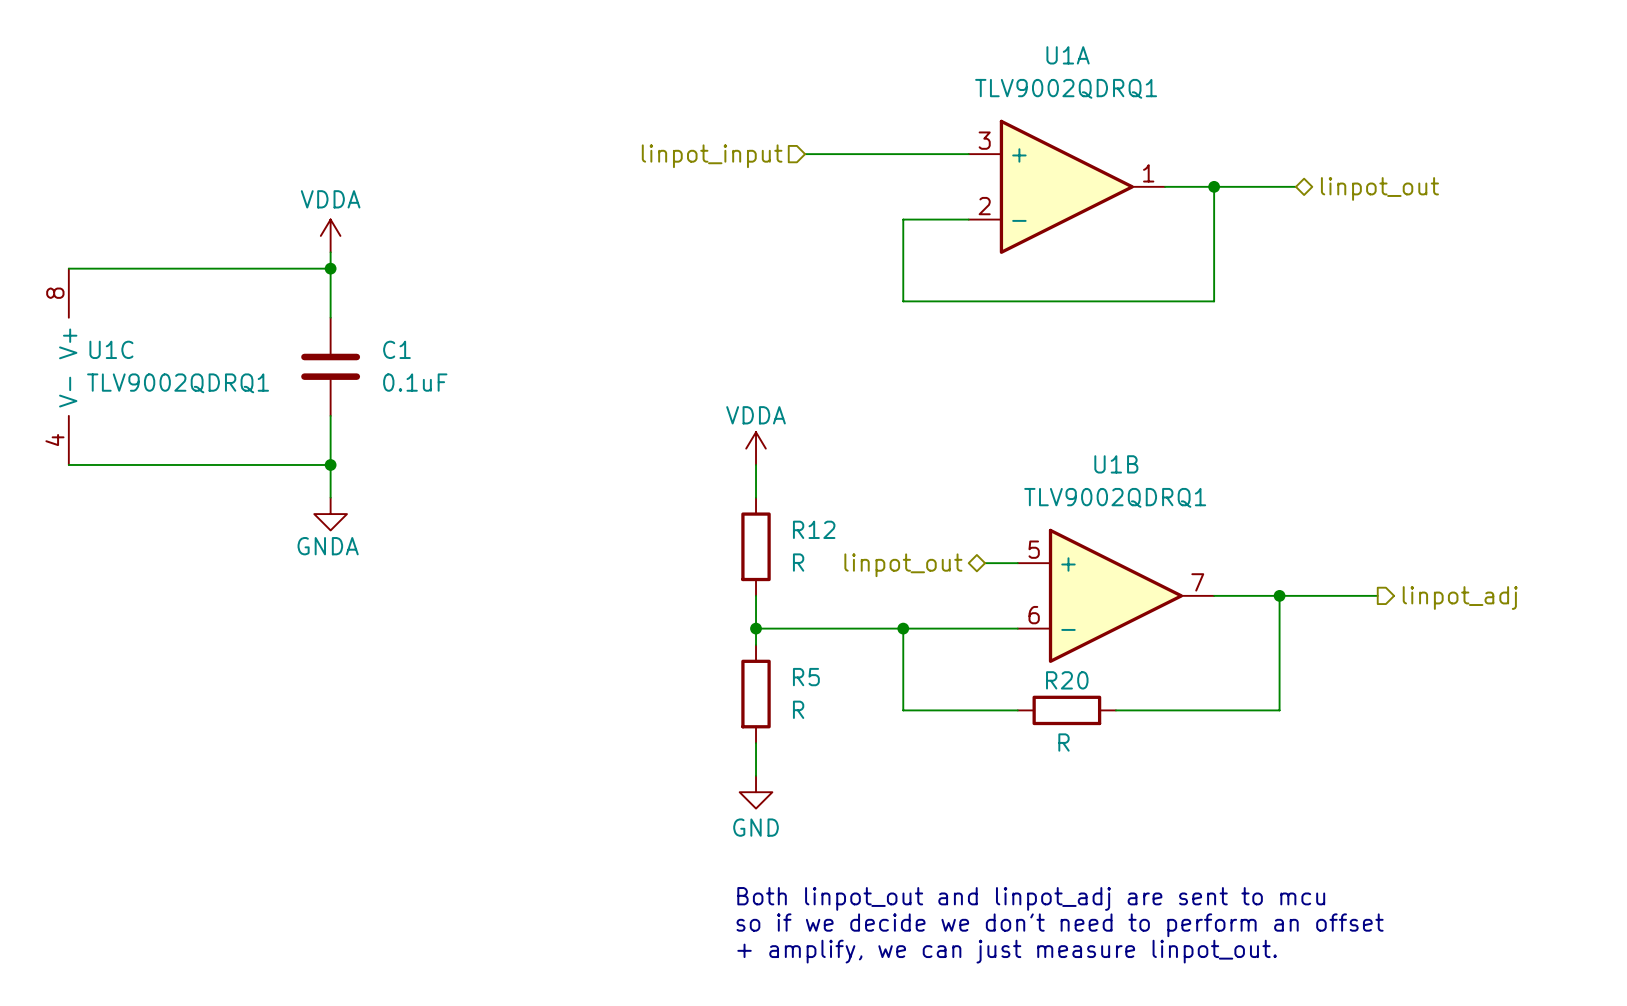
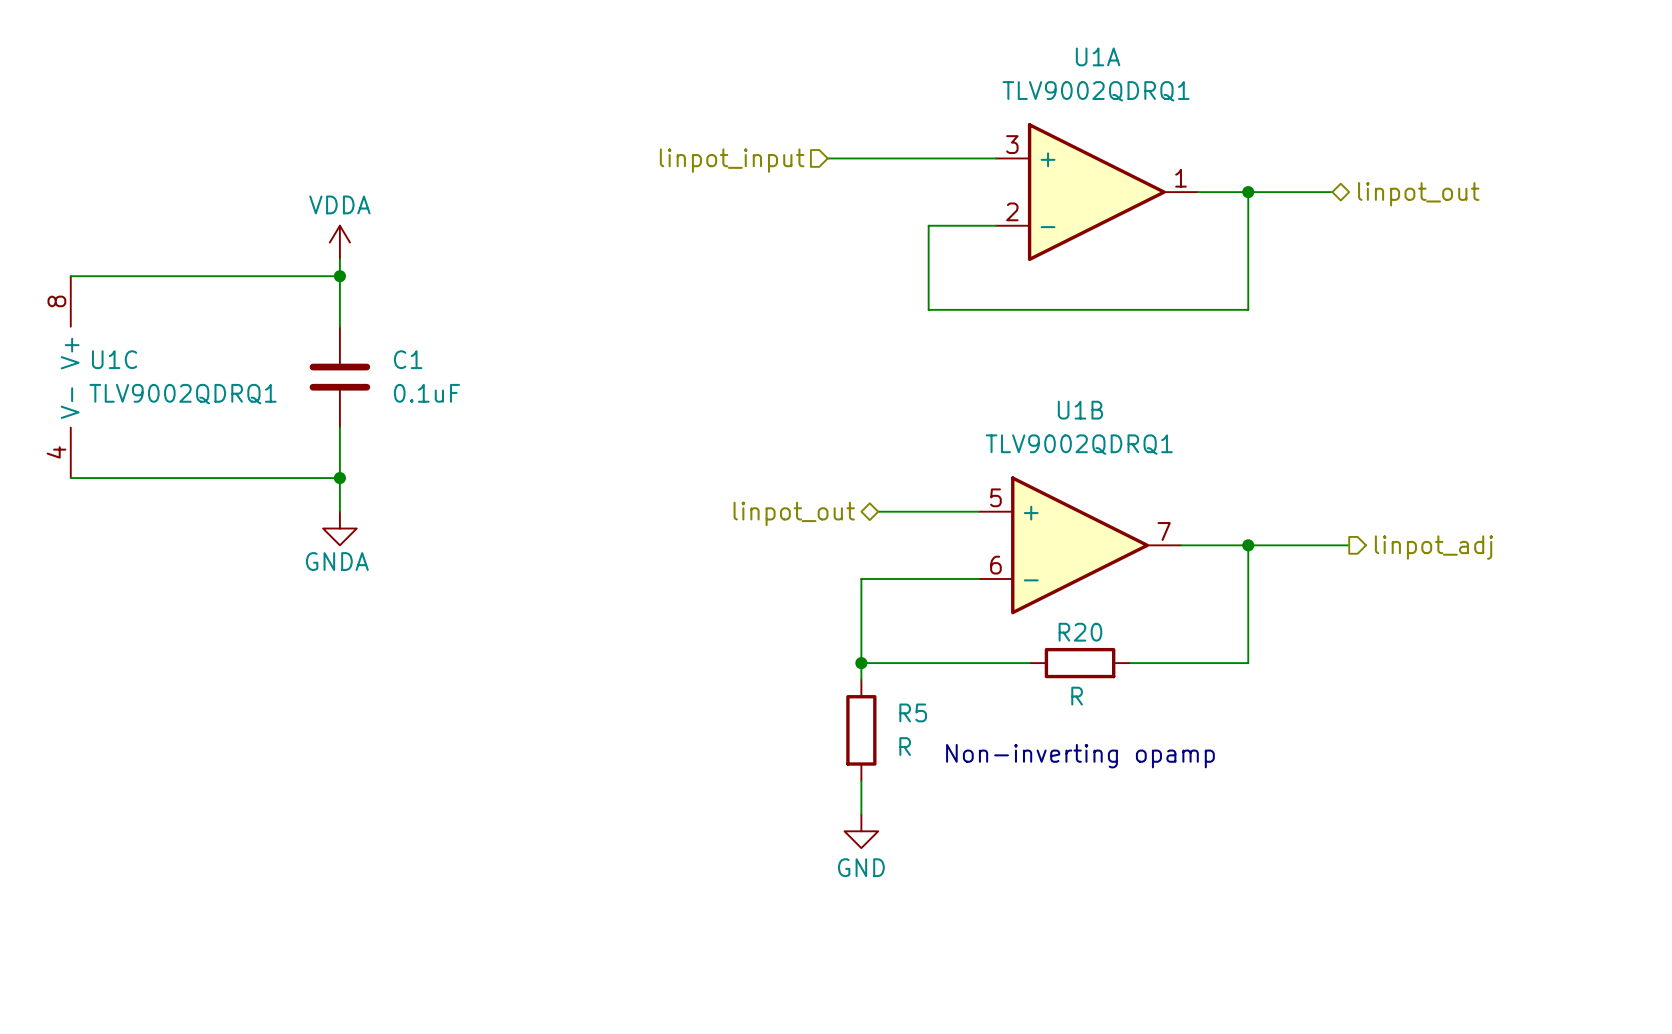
power symbol: VDDA (756, 448) -> none
wire: (756, 464) (756, 497) -> none
wire: none -> (878, 511) (979, 511)
wire: none -> (1248, 545) (1248, 663) (1130, 663)
junction: none -> (1248, 545)
R12: R (756, 546) -> none
wire: none -> (979, 578) (861, 578) (861, 679)
hierarchical label position: linpot_out (903, 565) -> linpot_out (794, 513)
wire: (756, 595) (756, 644) -> none
U1B position: (1115, 595) -> (1080, 545)
wire: (1214, 595) (1377, 595) -> (1180, 545) (1349, 545)
wire: (1279, 595) (1279, 710) (1115, 710) -> none
junction: (1279, 595) -> none
hierarchical label position: linpot_adj (1460, 597) -> linpot_adj (1433, 547)
wire: (756, 628) (1017, 628) -> none
junction: (756, 628) -> none
wire: (903, 628) (903, 710) (1017, 710) -> none
junction: (903, 628) -> none
wire: none -> (861, 663) (1029, 663)
junction: none -> (861, 663)
R5 position: (756, 694) -> (861, 730)
R20 position: (1066, 710) -> (1080, 663)
text: none -> Non-inverting opamp (1080, 756)
wire: (756, 743) (756, 775) -> (861, 780) (861, 814)
power symbol position: GND (756, 792) -> GND (861, 831)
text: Both linpot_out and linpot_adj are sent to mcu (1031, 898) -> none
text: so if we decide we don't need to perform an offset (1060, 925) -> none
text: + amplify, we can just measure linpot_out. (1007, 951) -> none

